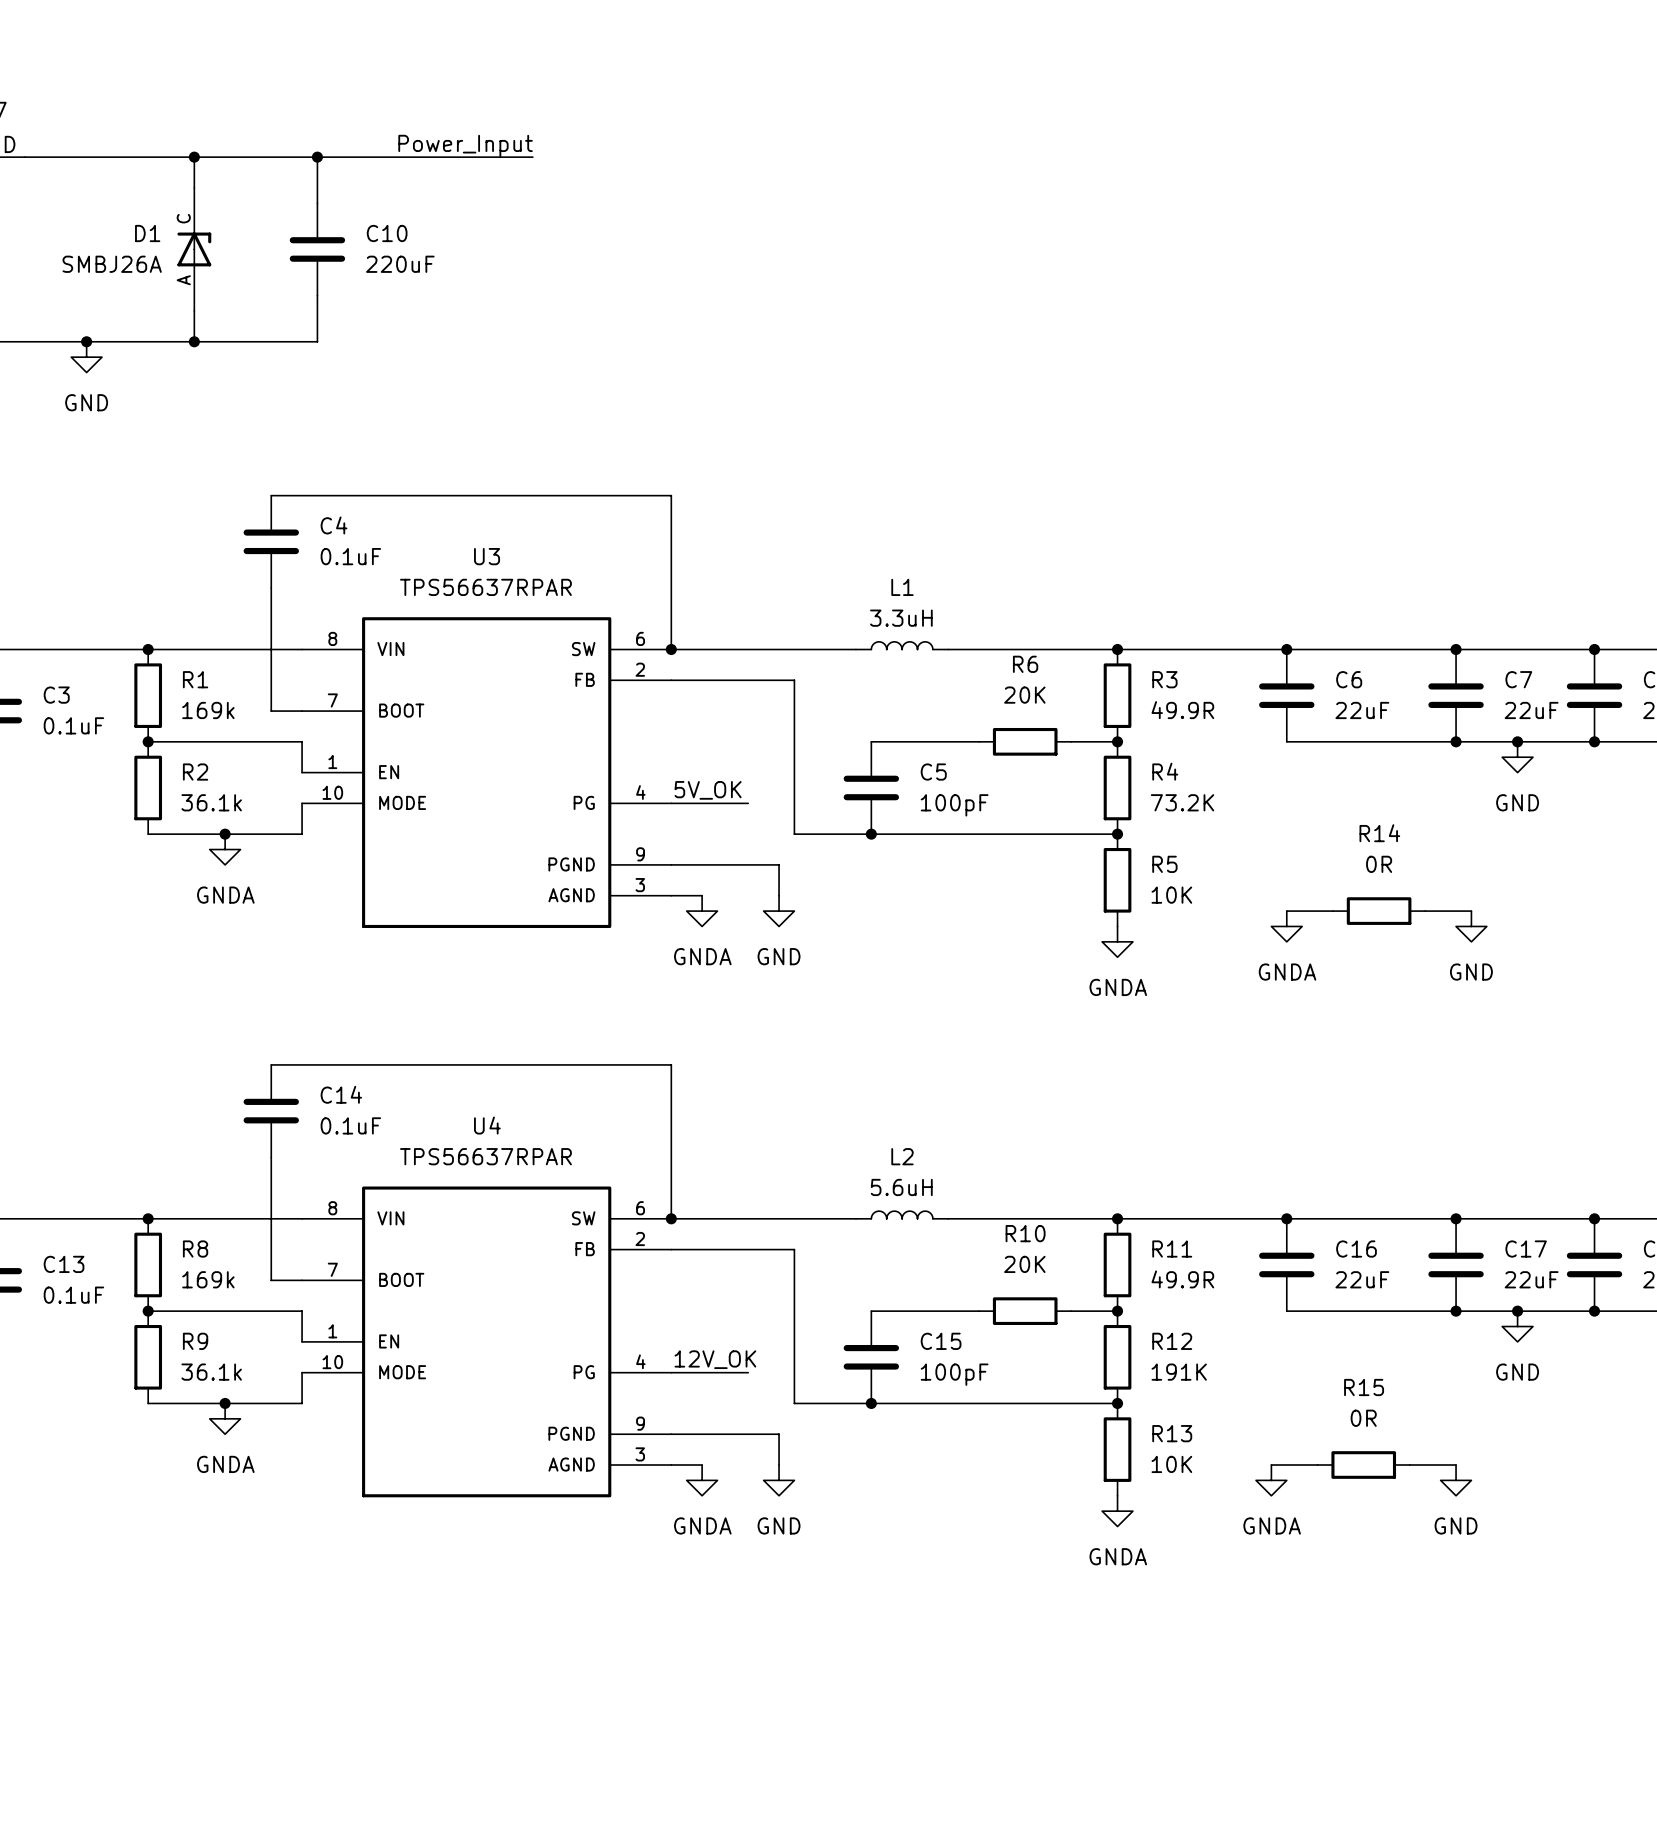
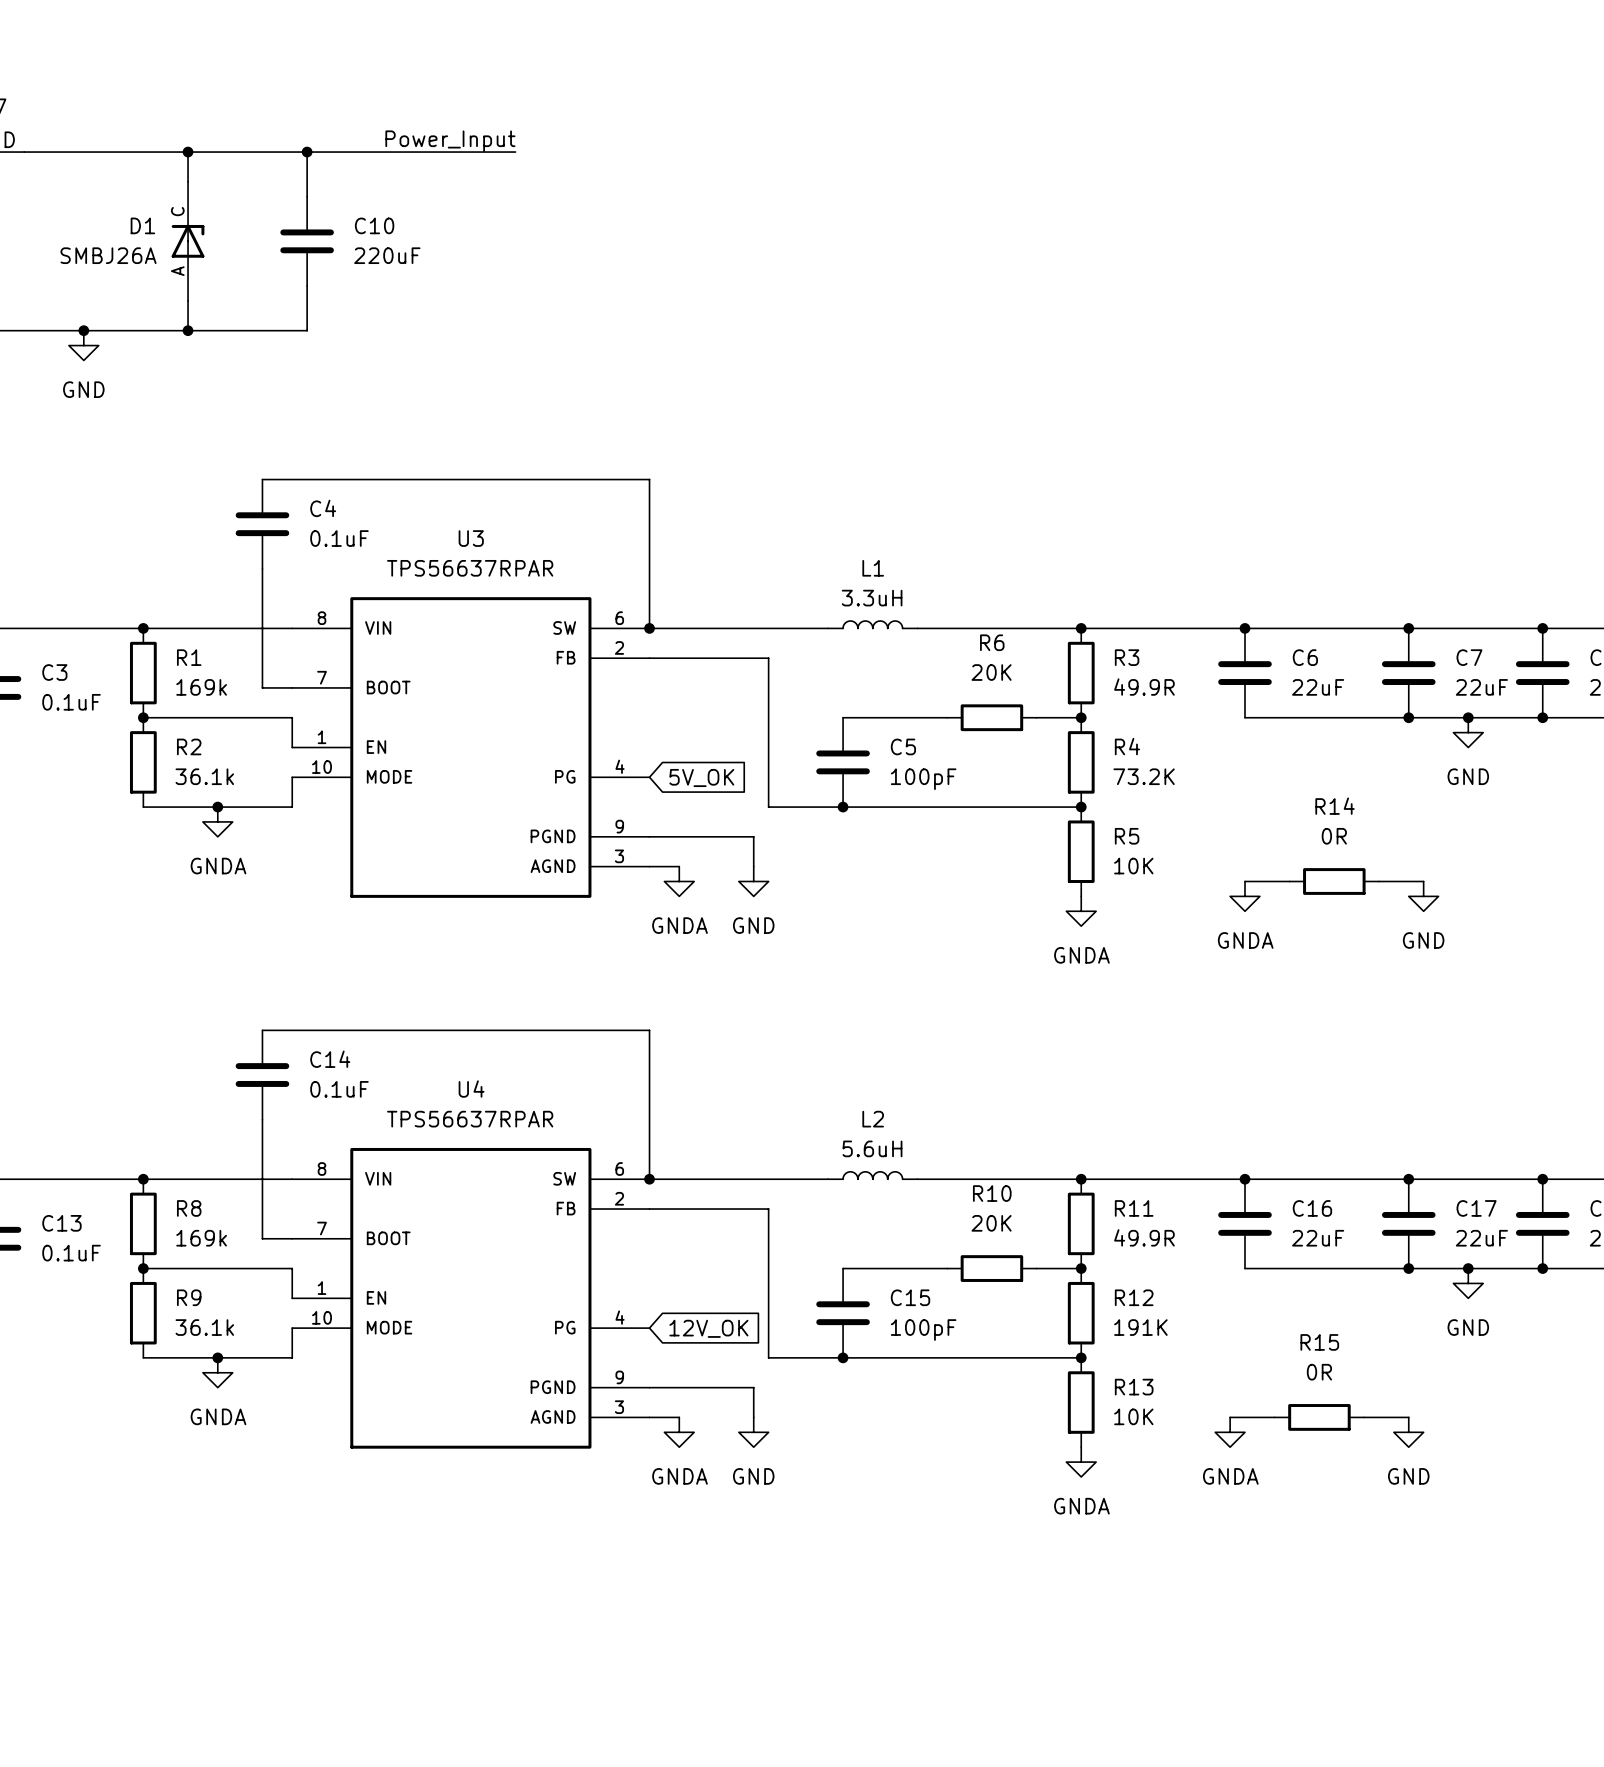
label: 5V_OK (708, 790) -> none
wire: (671, 803) (748, 803) -> none
global label: none -> 5V_OK (701, 777)
label: 12V_OK (715, 1359) -> none
wire: (671, 1372) (748, 1372) -> none
global label: none -> 12V_OK (708, 1328)

